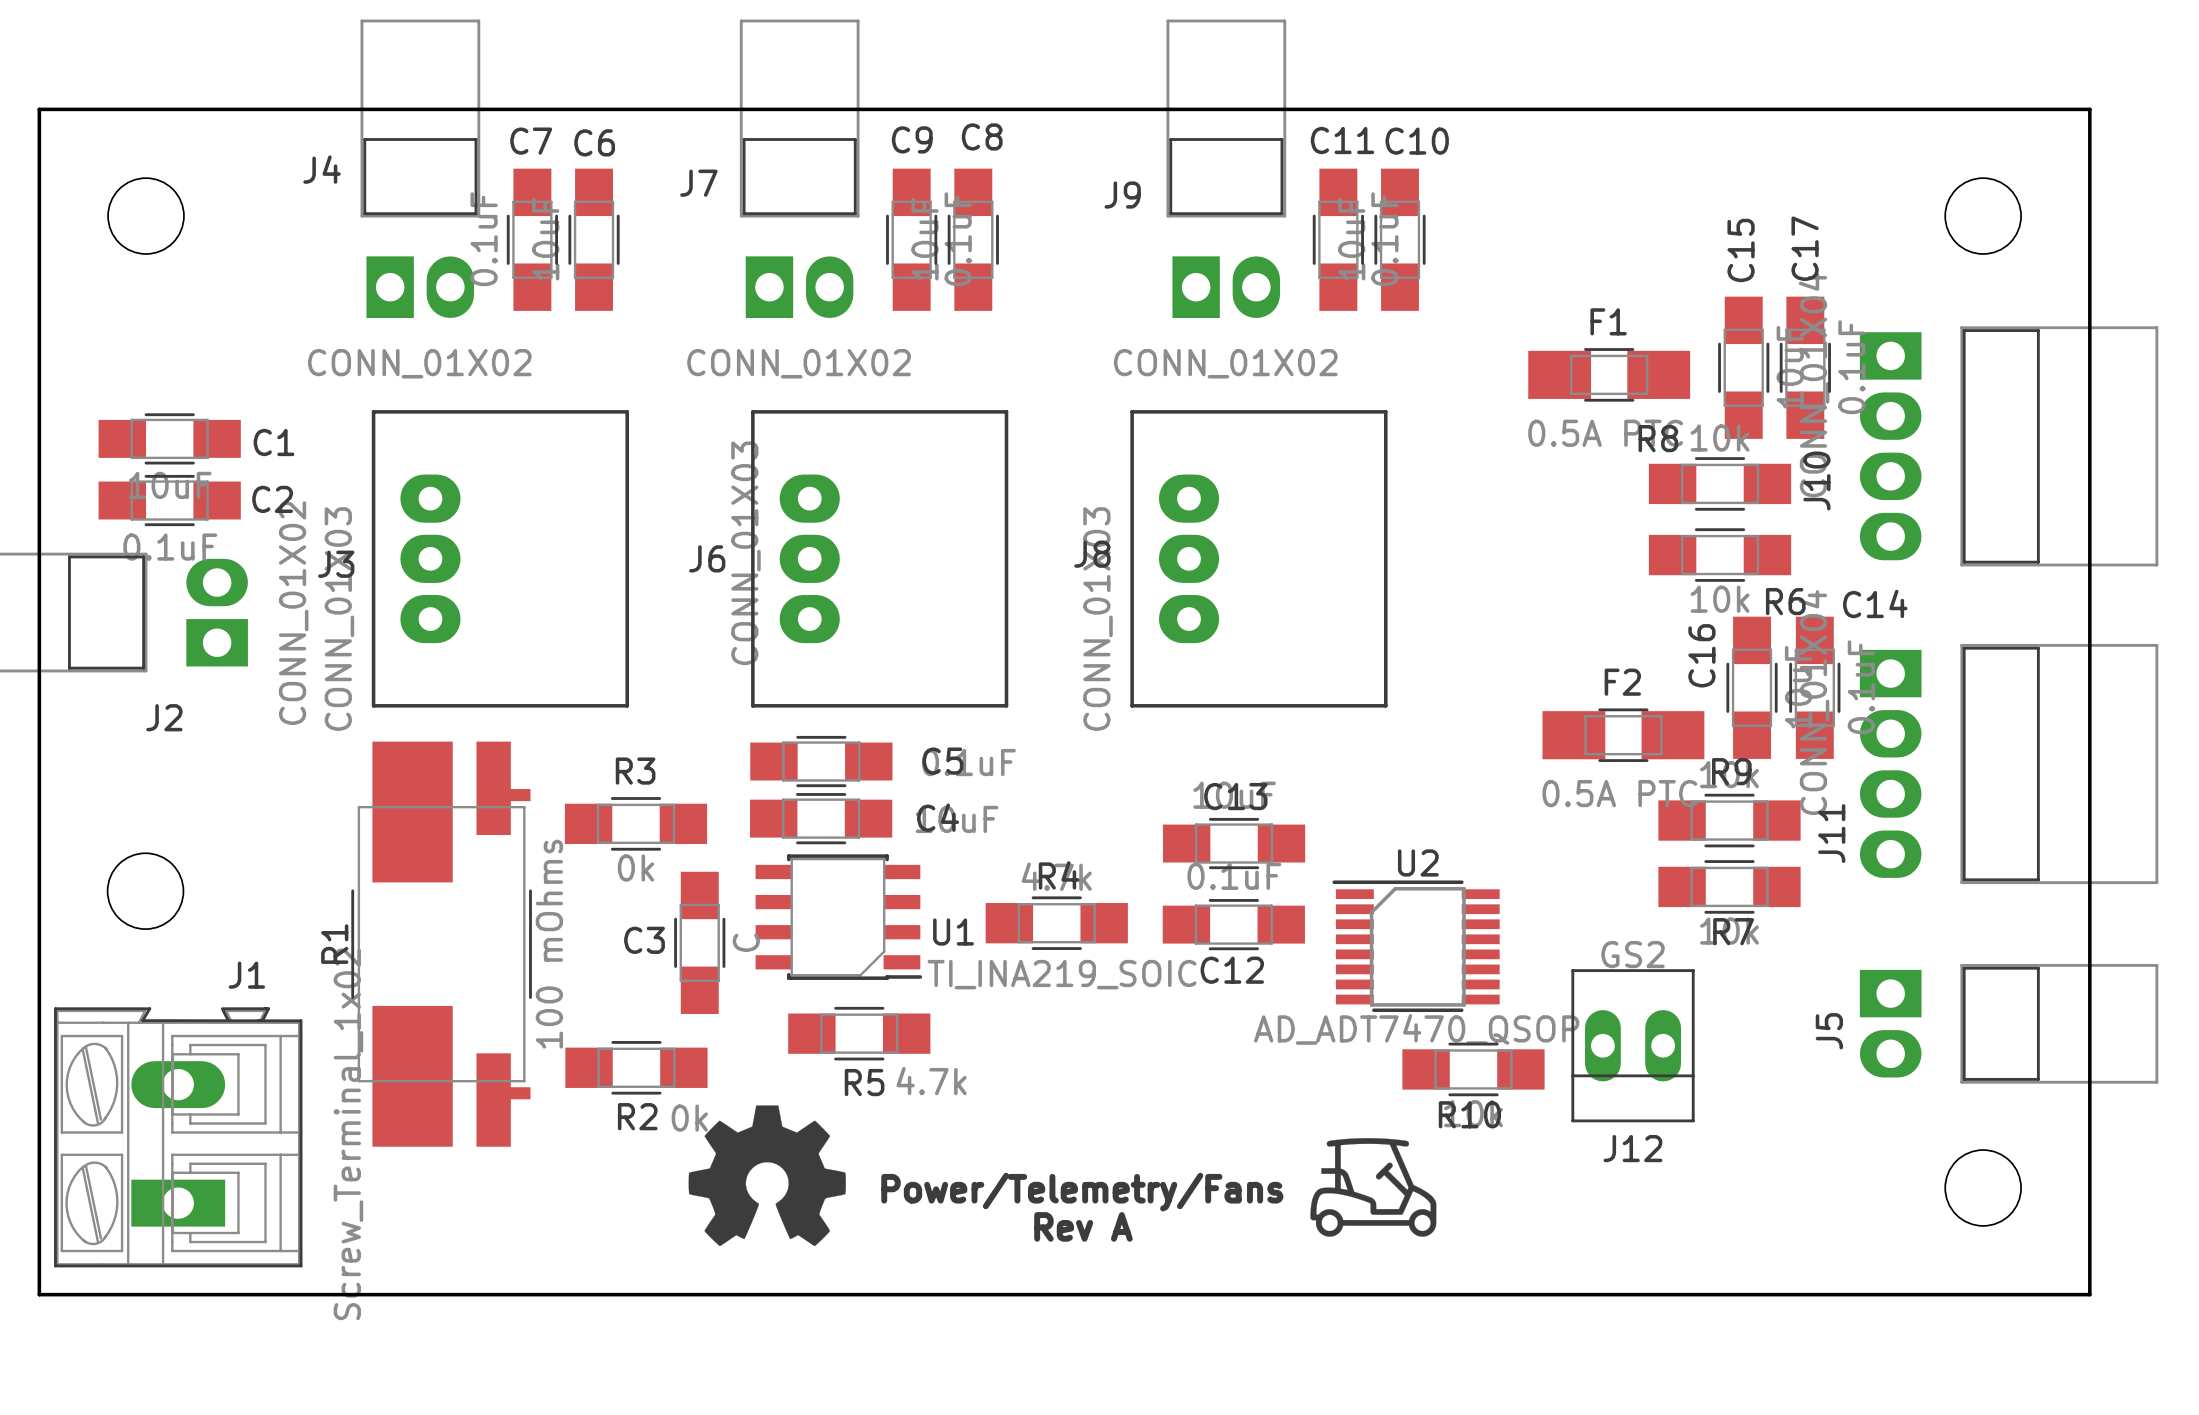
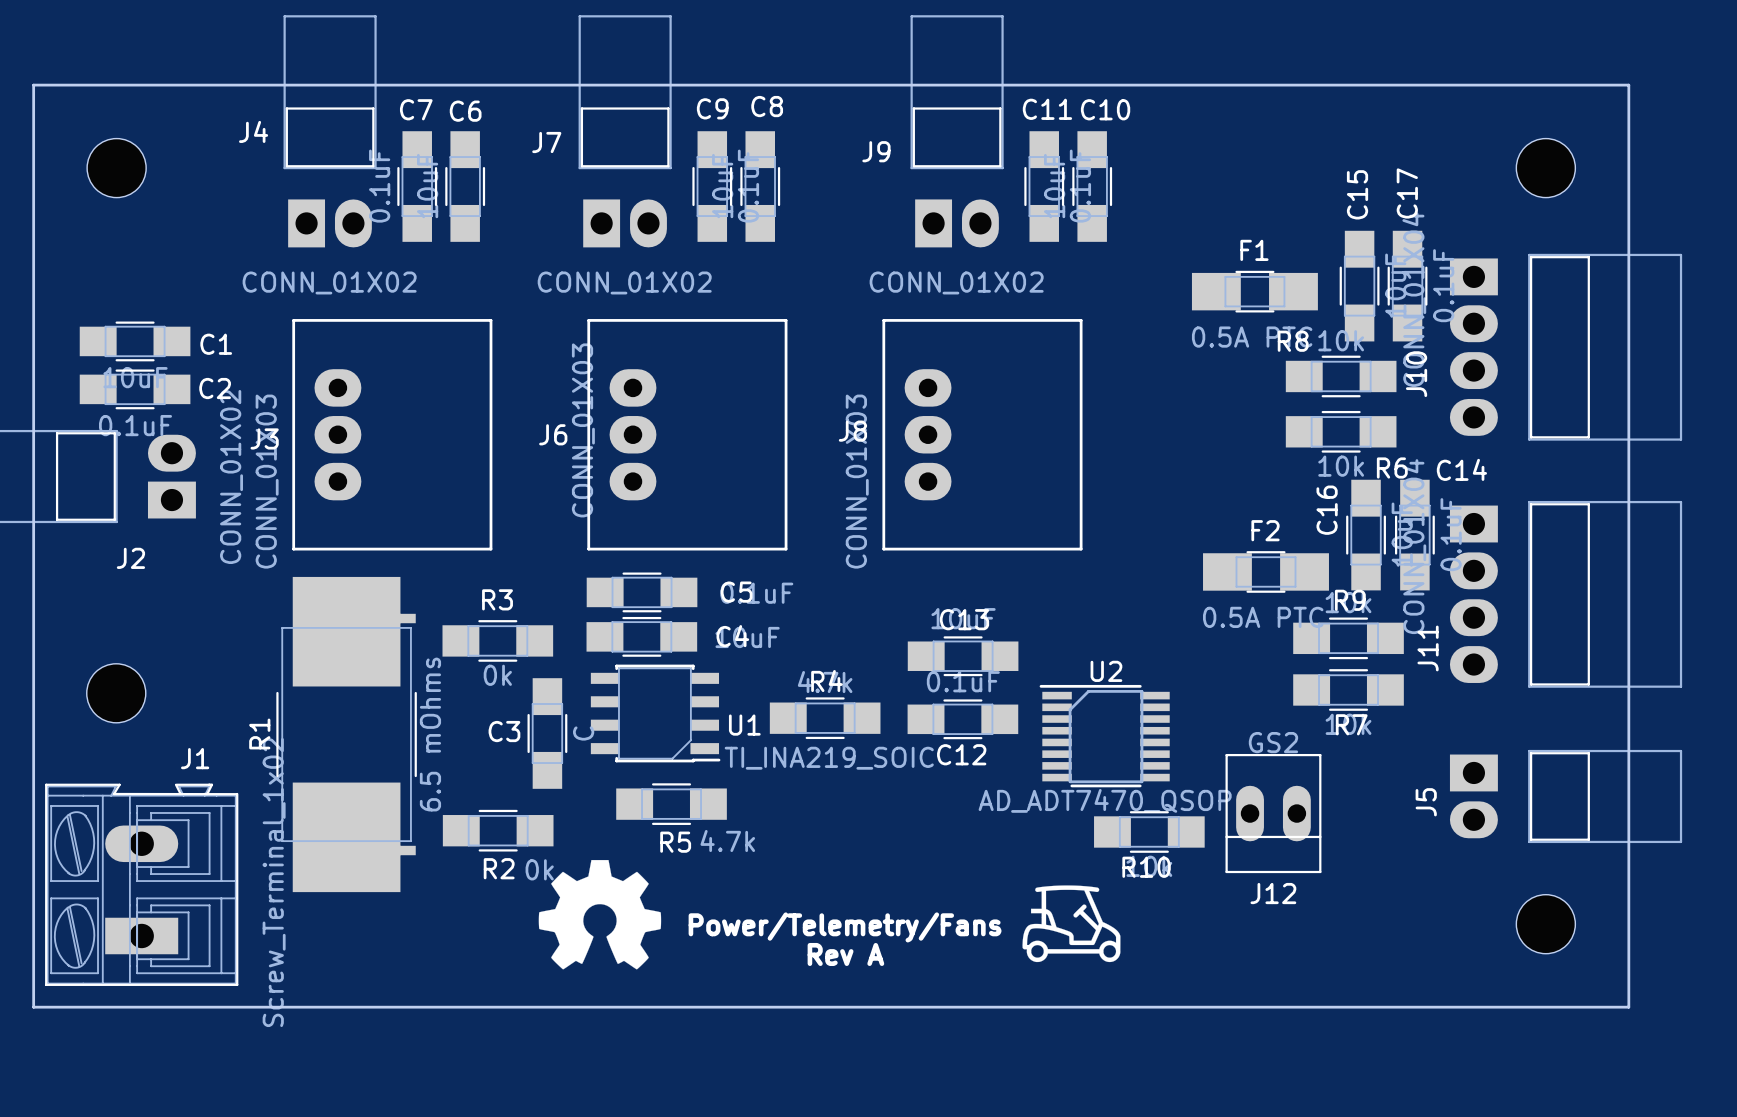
R1 footprint: [351, 741, 532, 1147] -> [276, 576, 417, 893]
R1 value: 100 mOhms (549, 944) -> 6.5 mOhms (430, 734)

